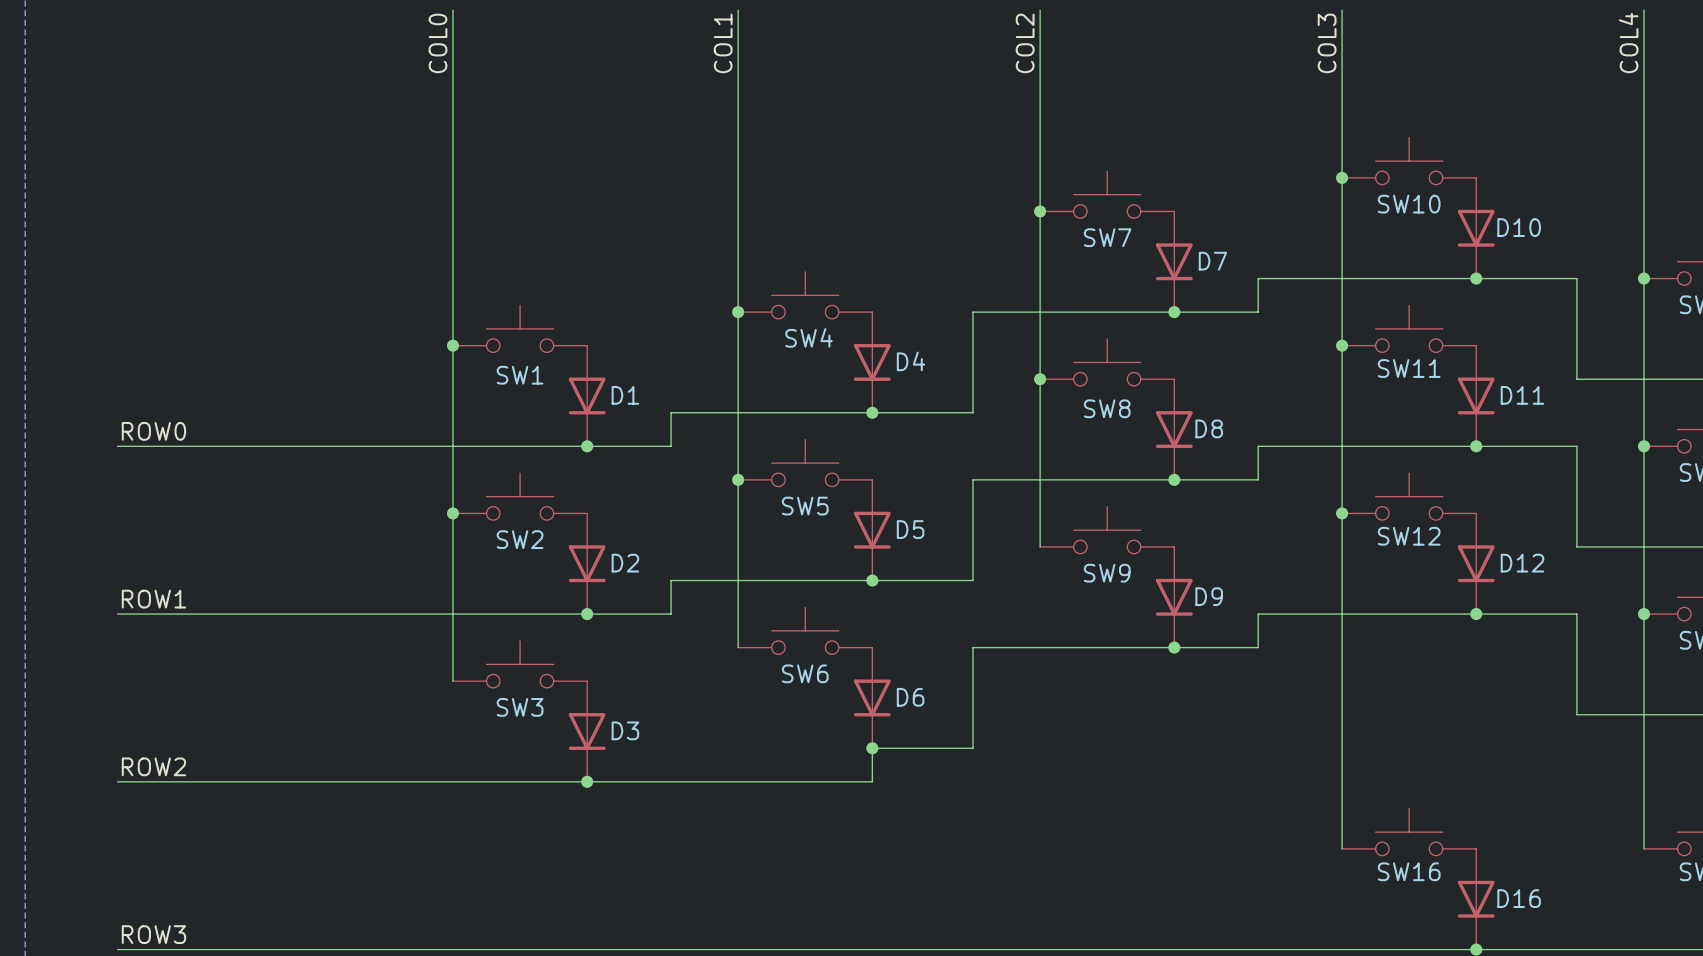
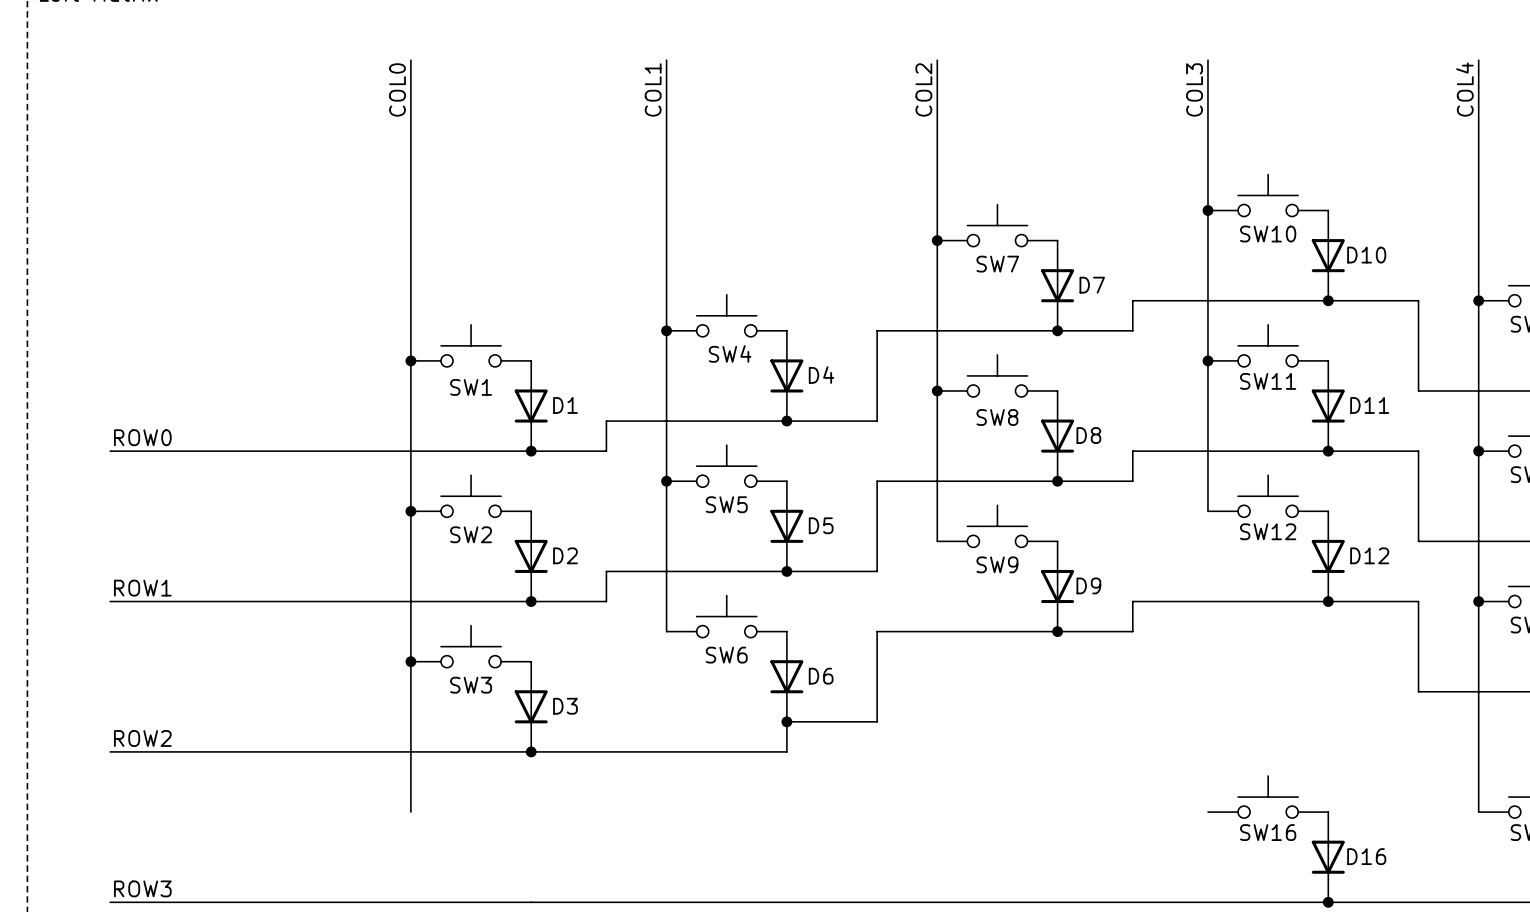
wire: (1342, 513) (1342, 848) -> none
junction: (1342, 513) -> none
wire: none -> (410, 661) (410, 812)
junction: none -> (410, 661)

